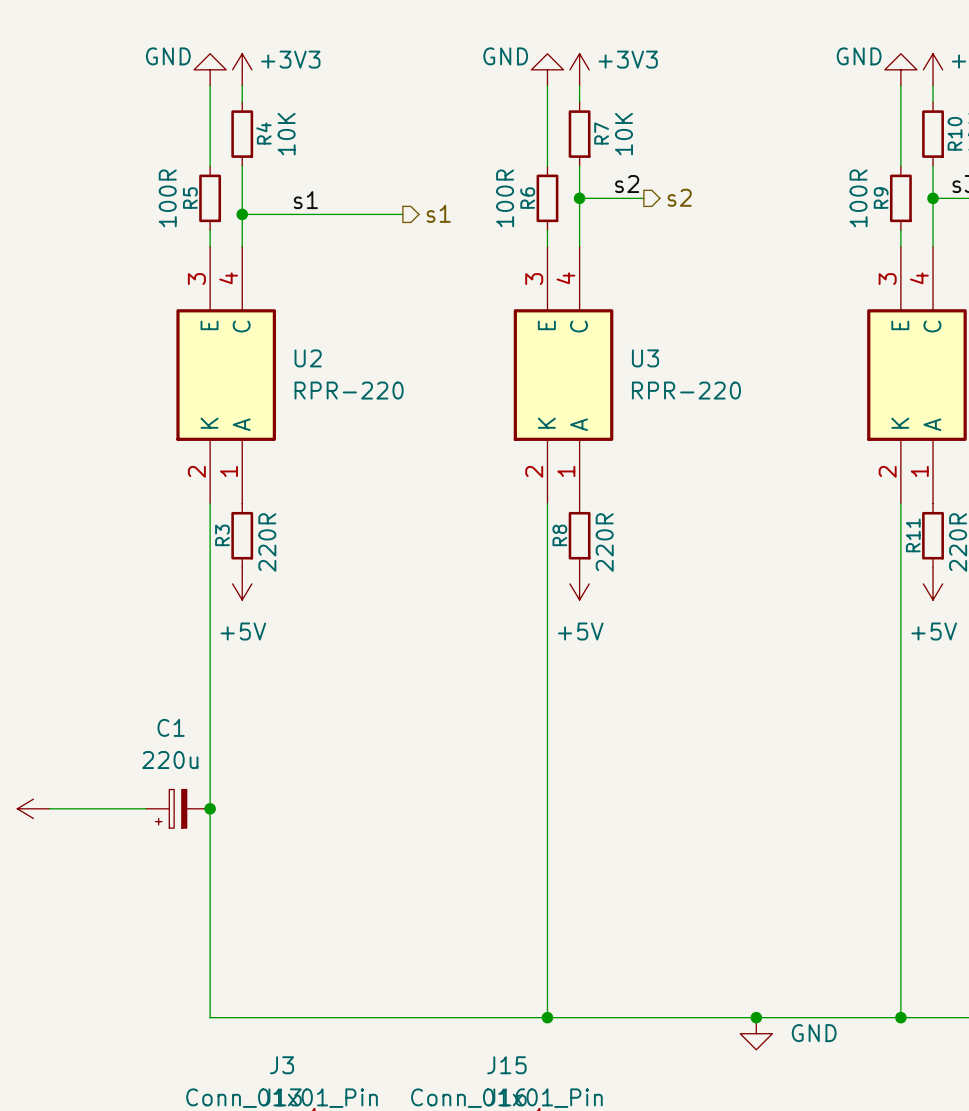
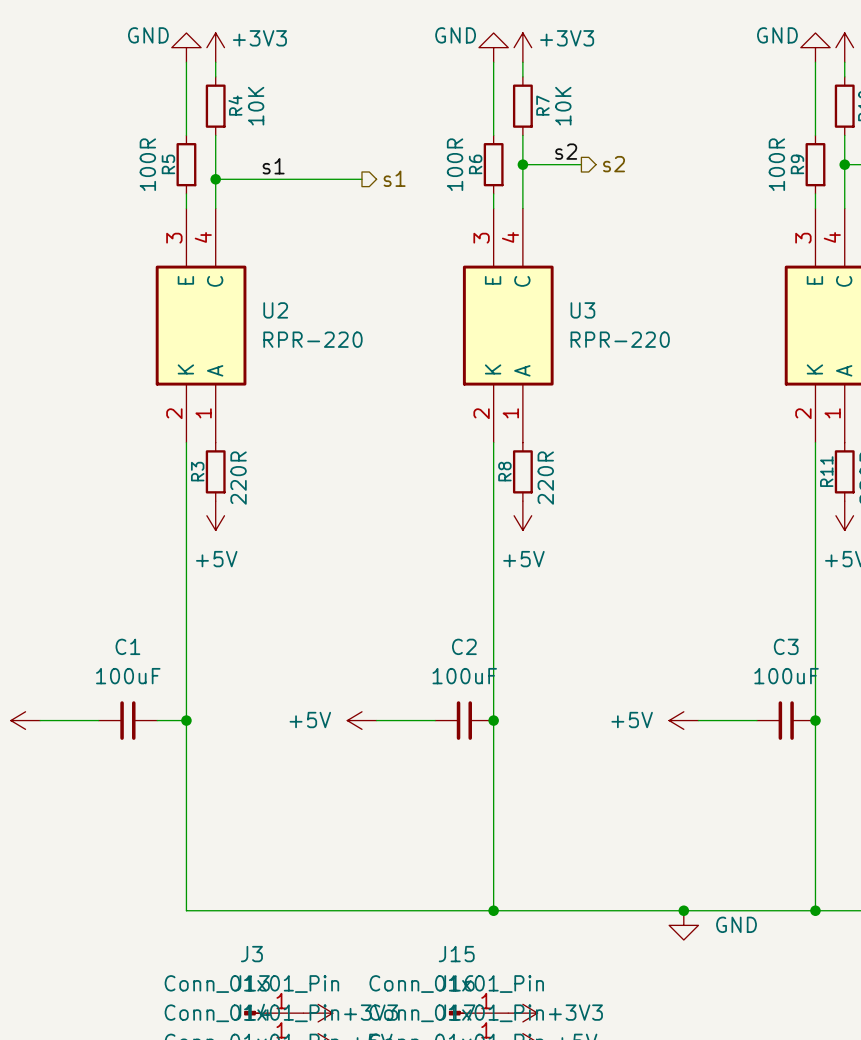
C1 value: 220u (170, 760) -> 100uF (128, 676)
C1 symbol: [145, 789, 211, 829] -> [98, 701, 158, 740]
power symbol: none -> +5V (361, 720)
wire: none -> (376, 720) (435, 720)
C2: none -> 100uF (464, 720)
junction: none -> (493, 720)
power symbol: none -> +5V (683, 720)
wire: none -> (698, 720) (756, 720)
C3: none -> 100uF (786, 720)
junction: none -> (815, 720)

